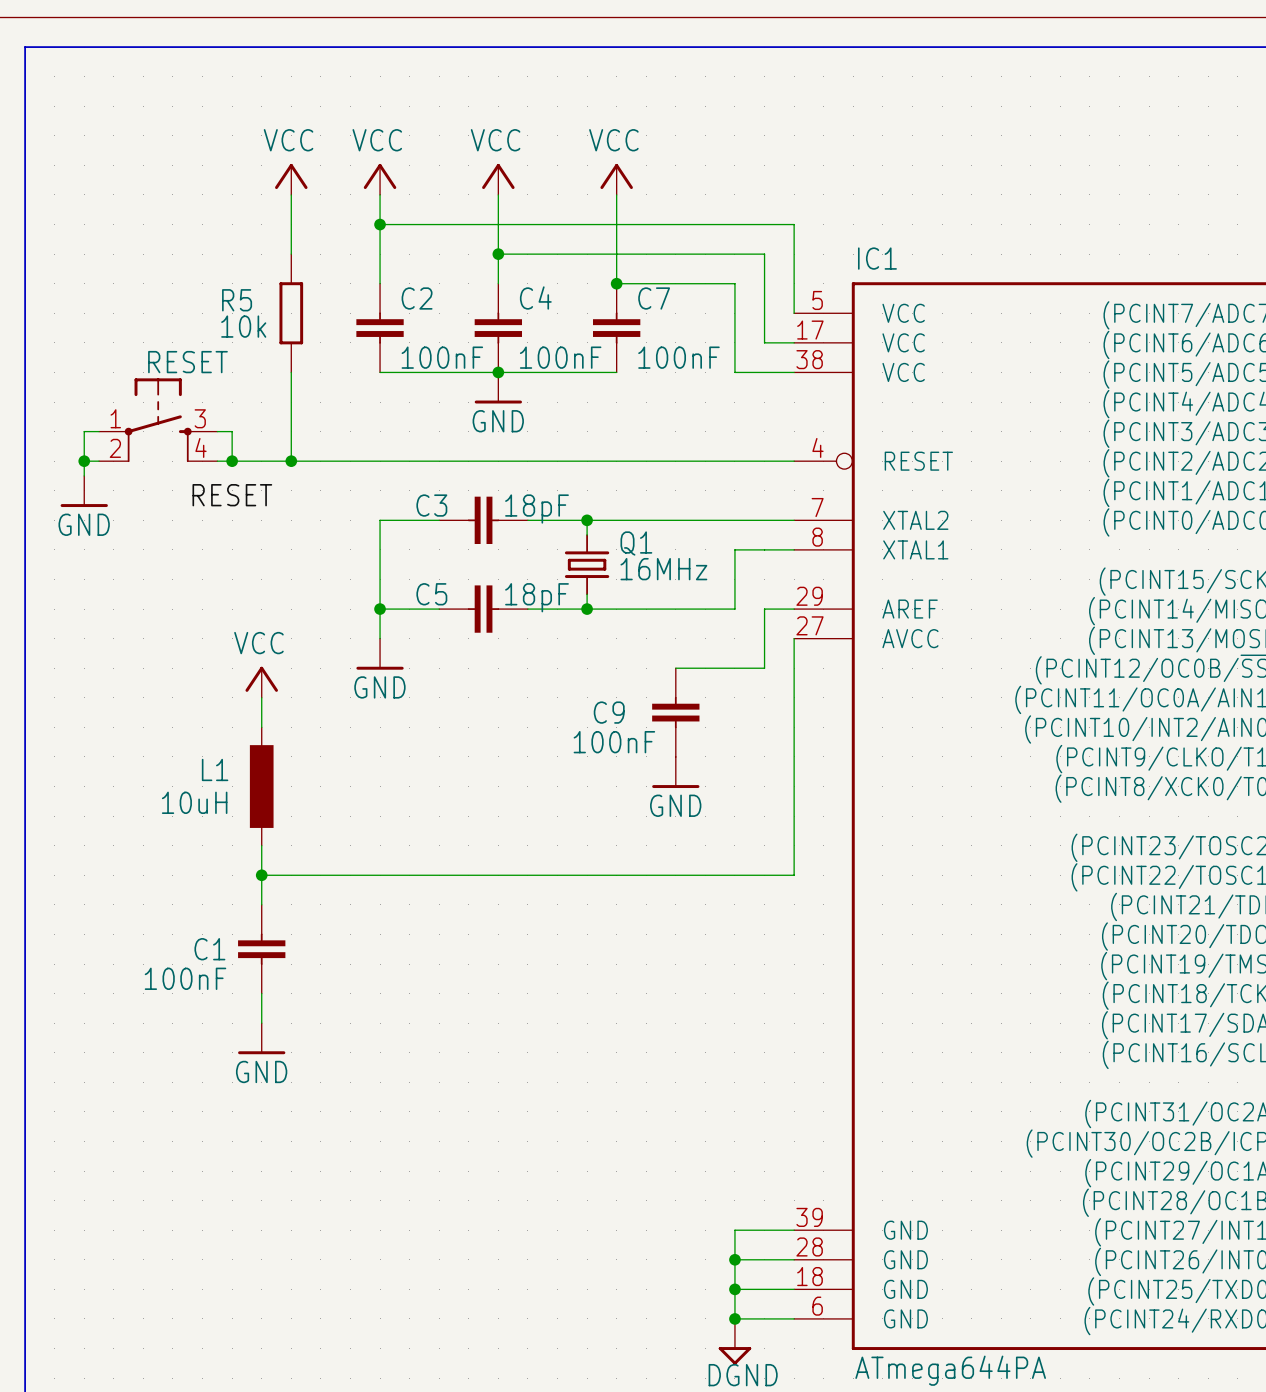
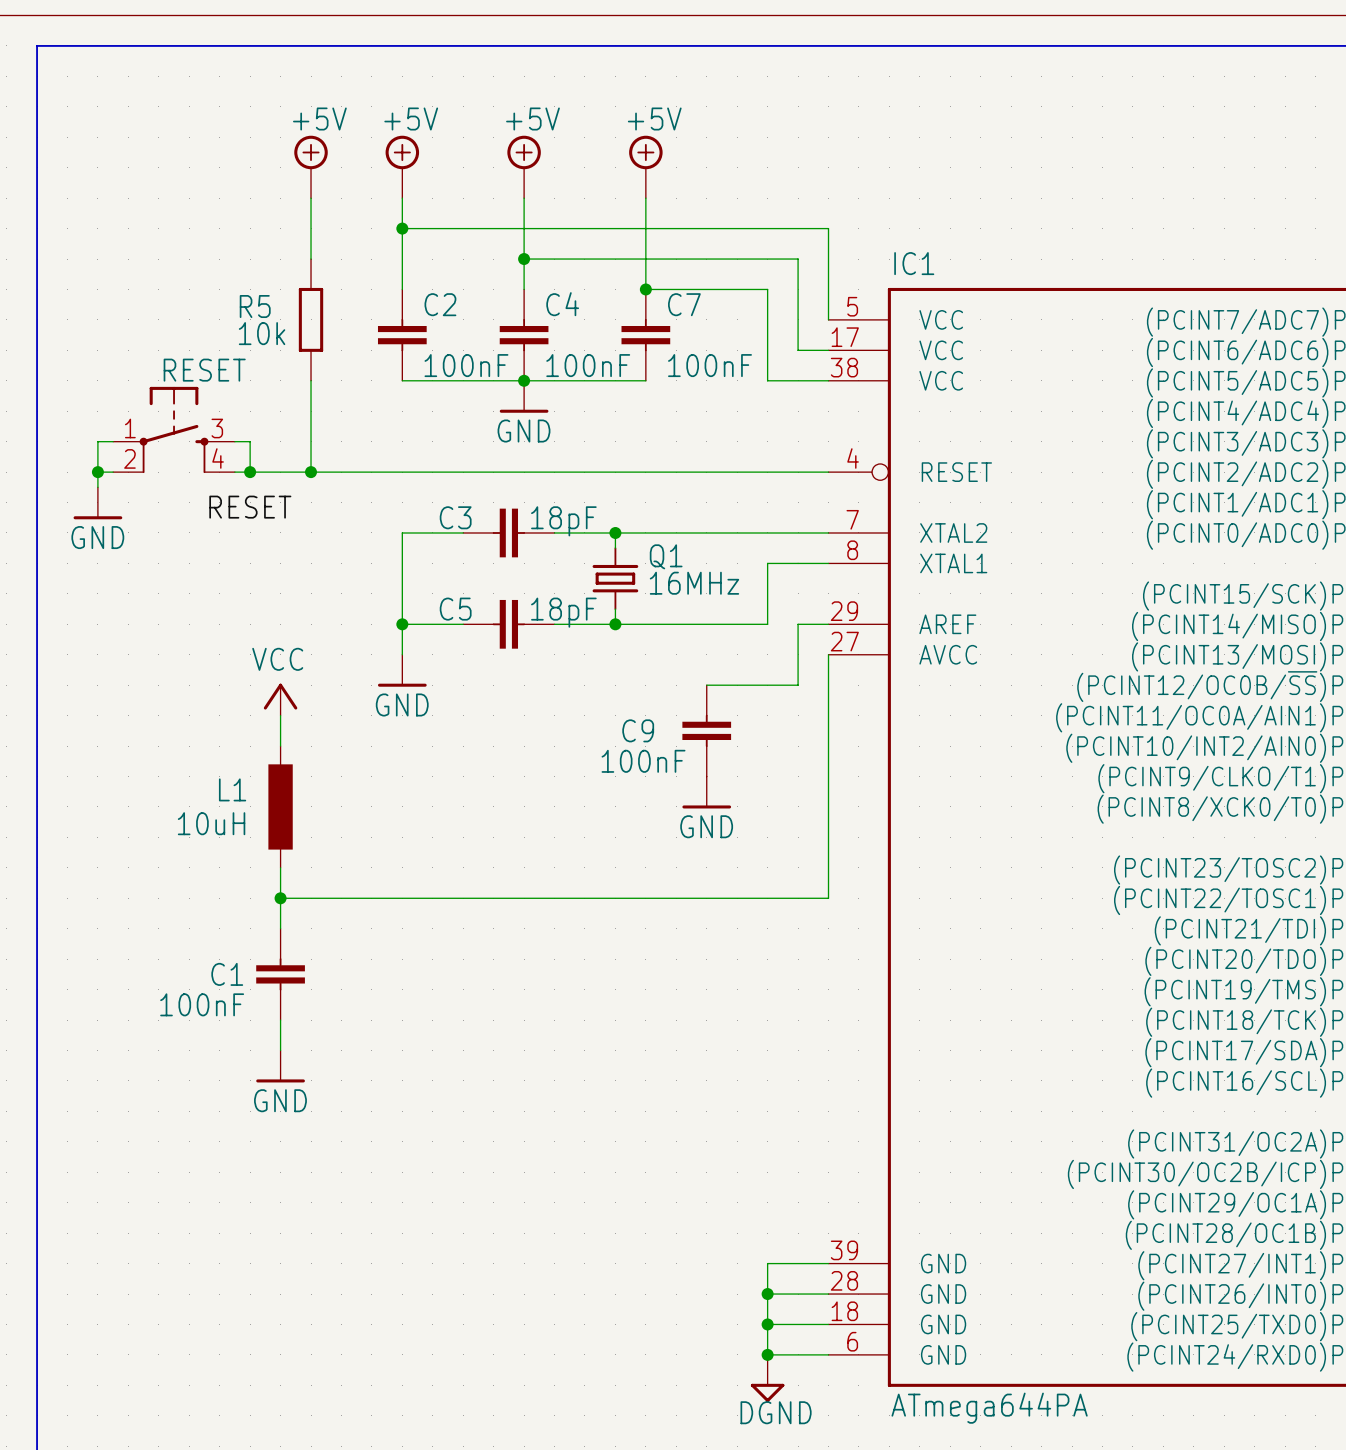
power symbol: none -> +5V (311, 166)
power symbol: none -> +5V (402, 166)
power symbol: none -> +5V (524, 166)
power symbol: none -> +5V (645, 166)
power symbol: VCC (291, 179) -> none
power symbol: VCC (380, 179) -> none
power symbol: VCC (498, 179) -> none
power symbol: VCC (616, 179) -> none

